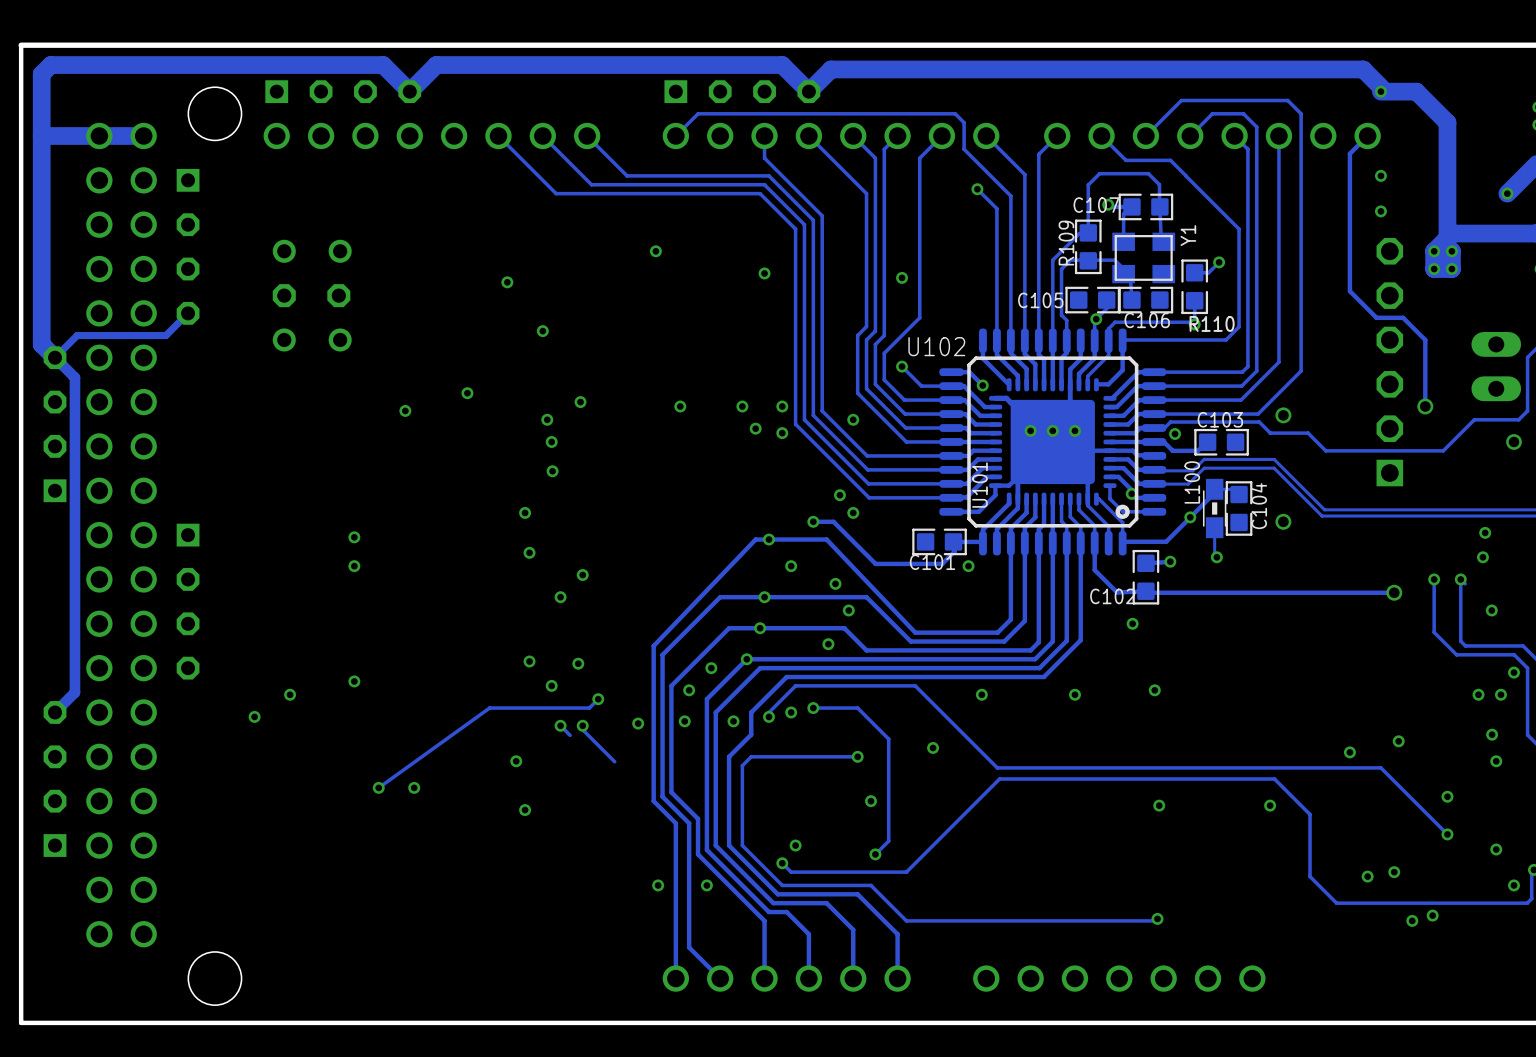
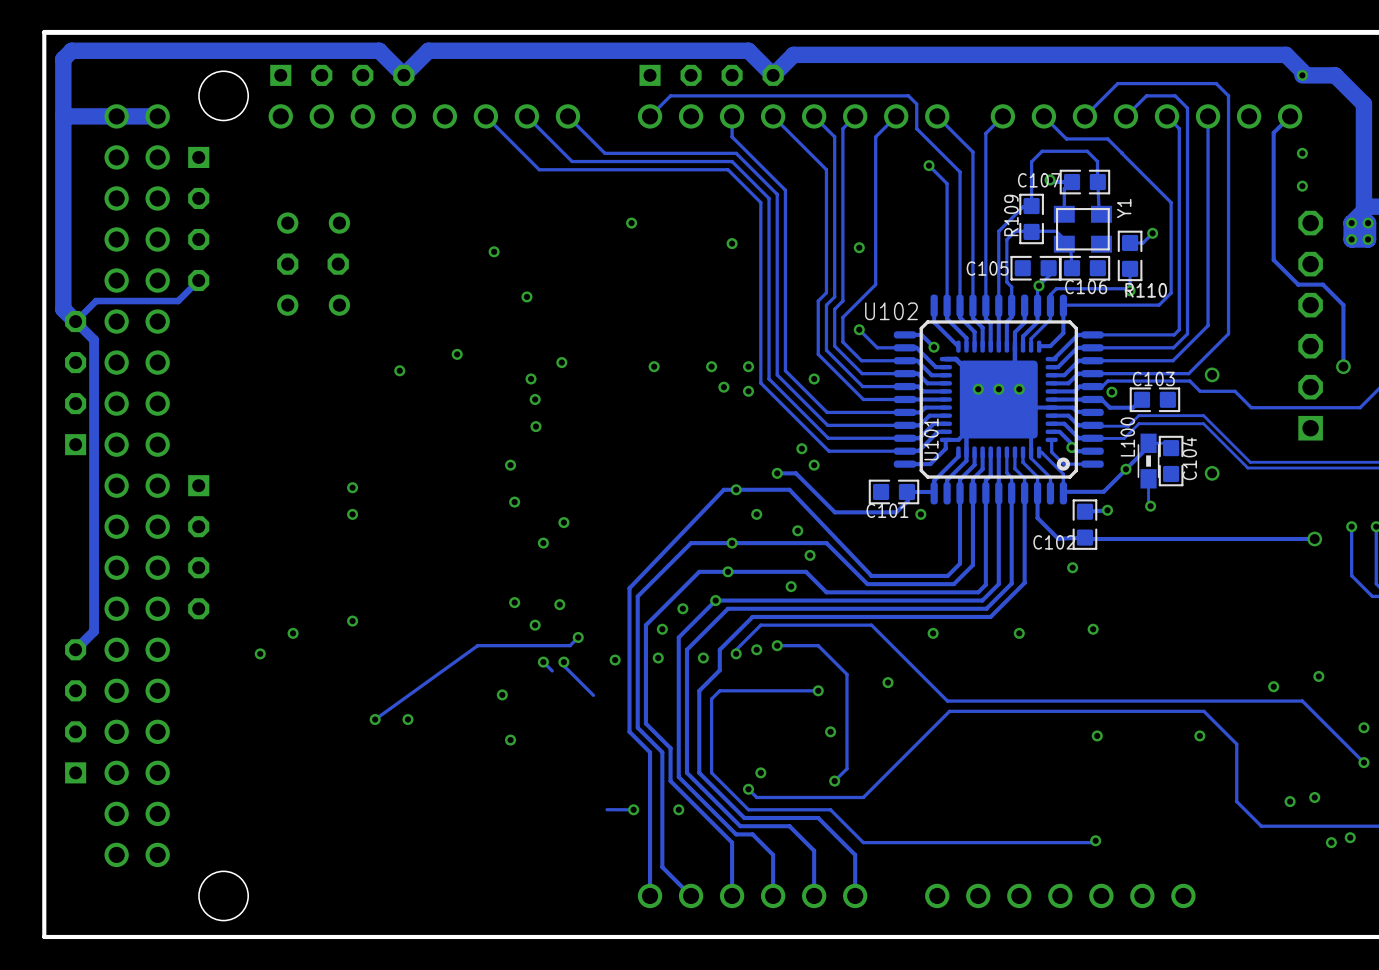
track: none -> (607, 809) (633, 809)

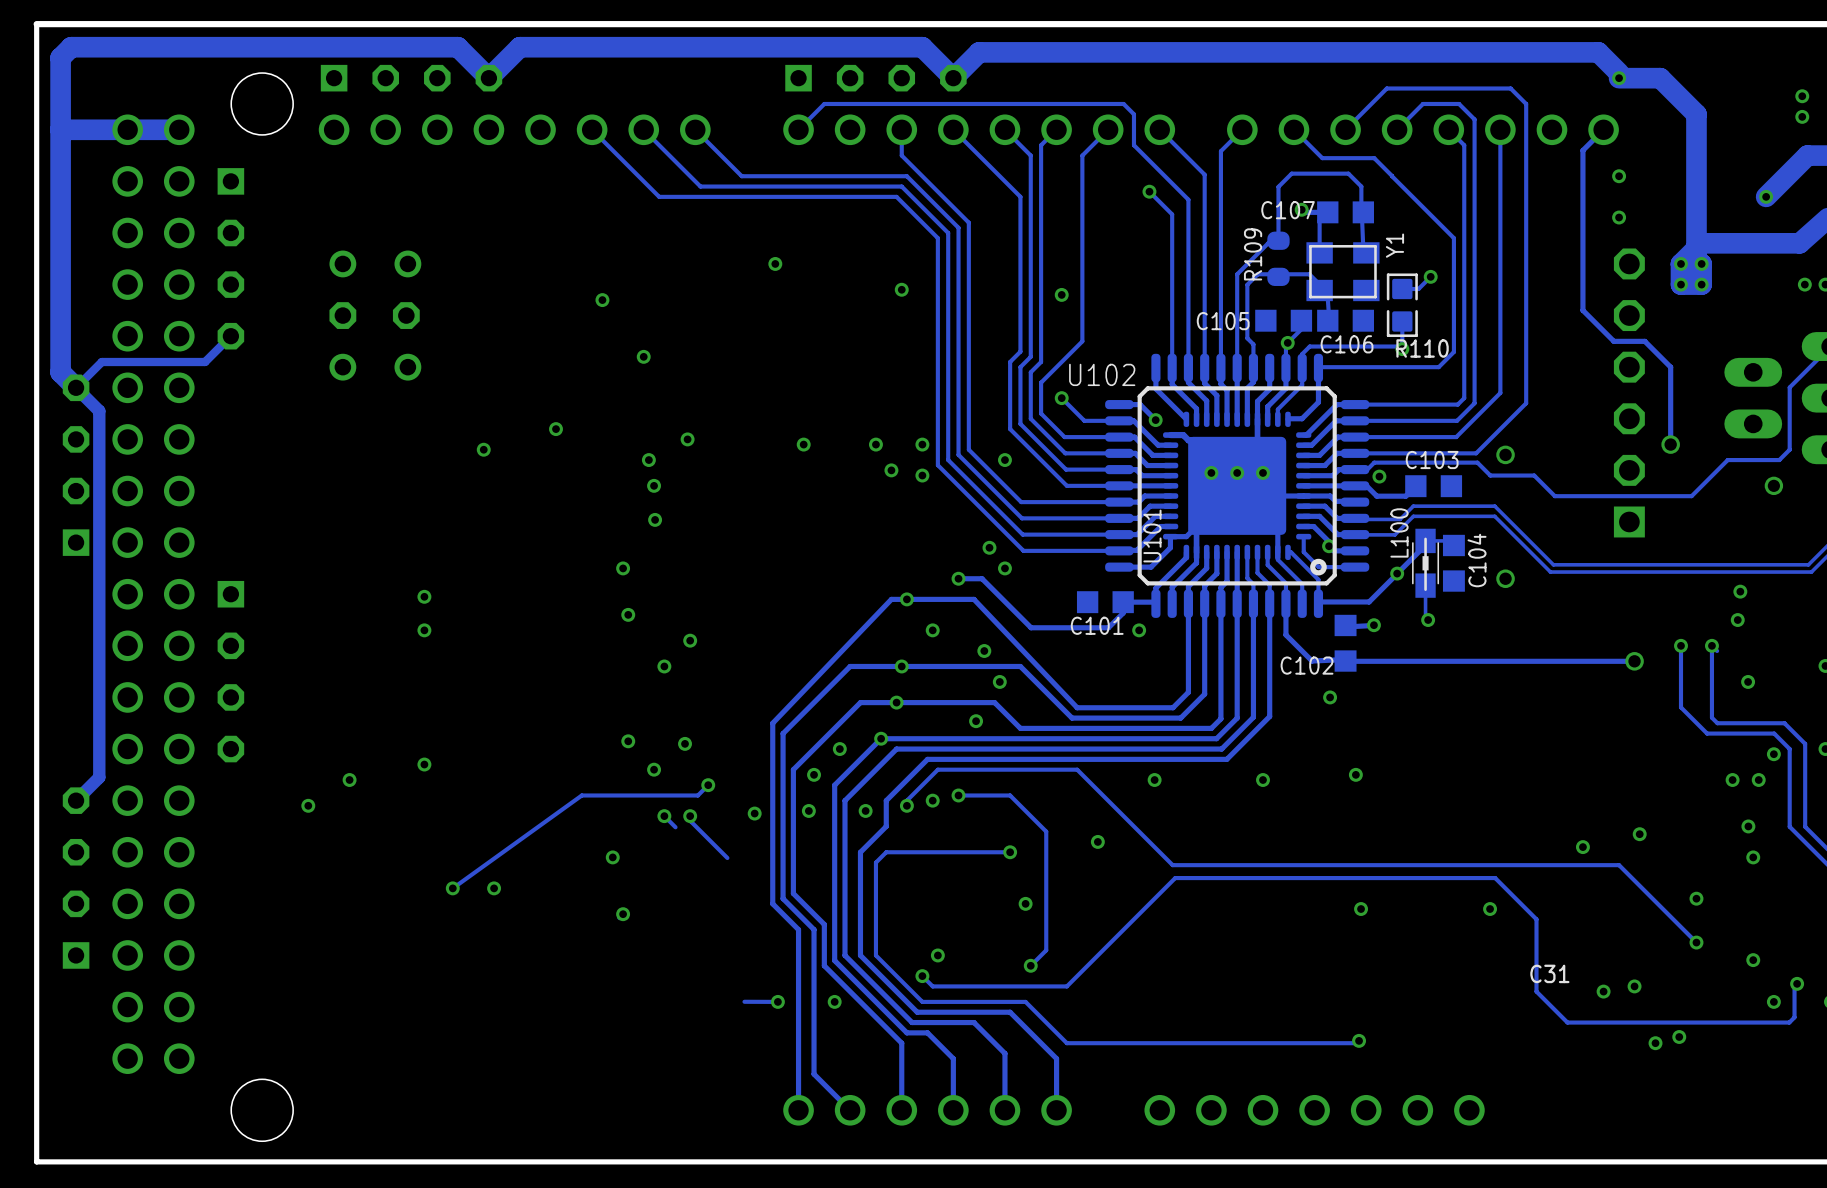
C107 footprint: [1059, 169, 1111, 195] -> [1317, 201, 1375, 224]
R109 footprint: [1019, 193, 1044, 245] -> [1267, 231, 1290, 286]
C105 footprint: [1010, 255, 1061, 281] -> [1255, 309, 1313, 332]
C106 footprint: [1059, 255, 1111, 281] -> [1317, 309, 1375, 332]
C103 footprint: [1129, 387, 1181, 413] -> [1405, 475, 1463, 498]
L100 footprint: [1137, 433, 1160, 489] -> [1412, 528, 1439, 598]
C104 footprint: [1158, 435, 1184, 487] -> [1442, 534, 1465, 592]
C101 footprint: [868, 479, 920, 505] -> [1076, 591, 1134, 614]
C102 footprint: [1072, 499, 1098, 550] -> [1334, 614, 1357, 672]
C31: none -> (1549, 973)

